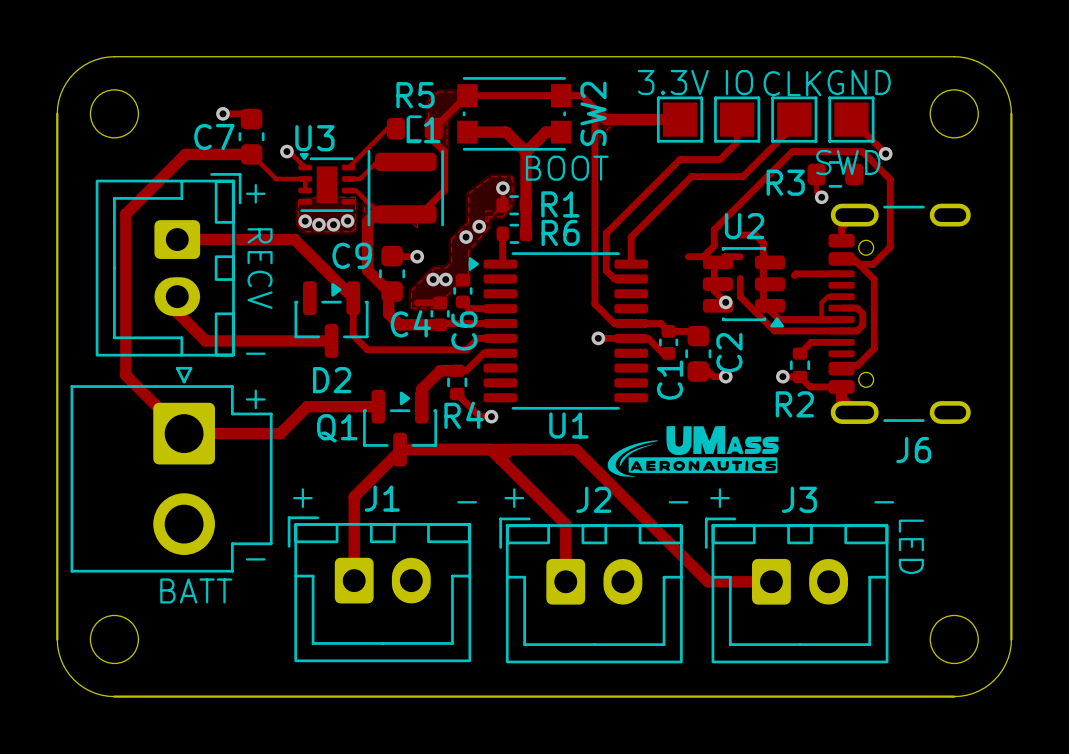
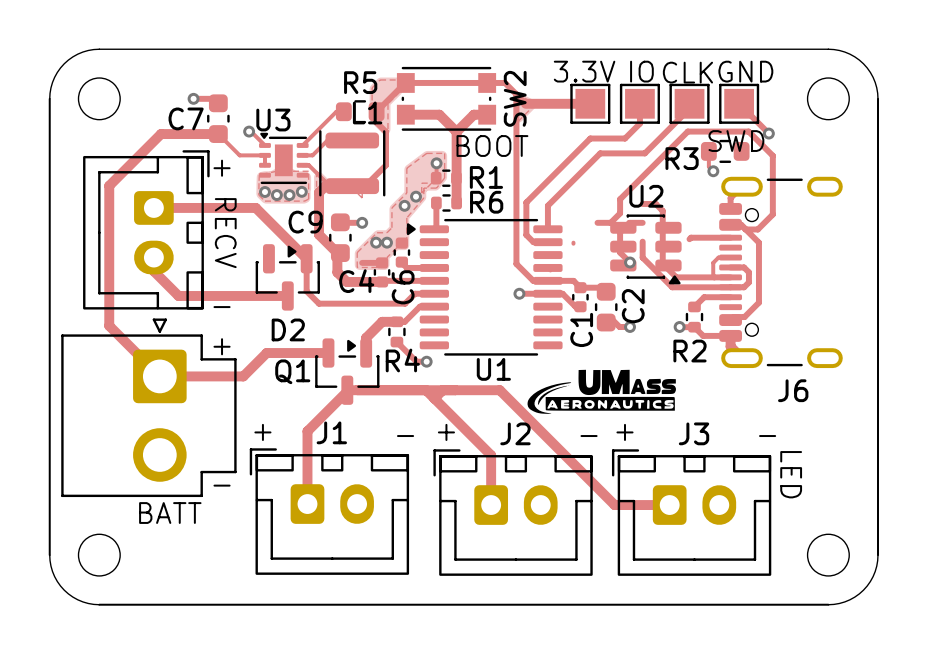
track: none -> (573, 242) (573, 243)

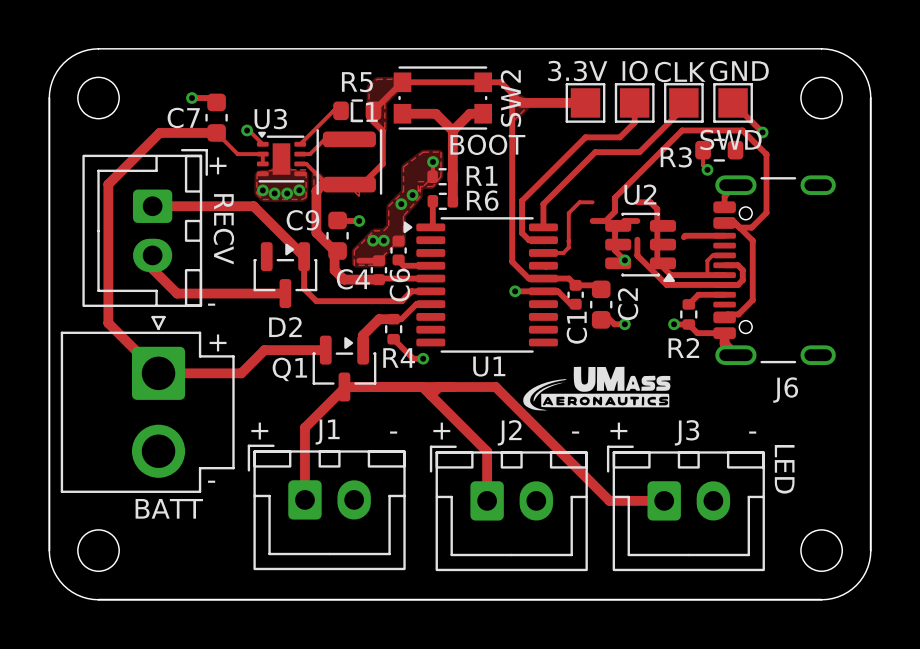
track: none -> (592, 202) (579, 202) (568, 213) (568, 240)
track: none -> (568, 241) (568, 247) (563, 252) (543, 252)

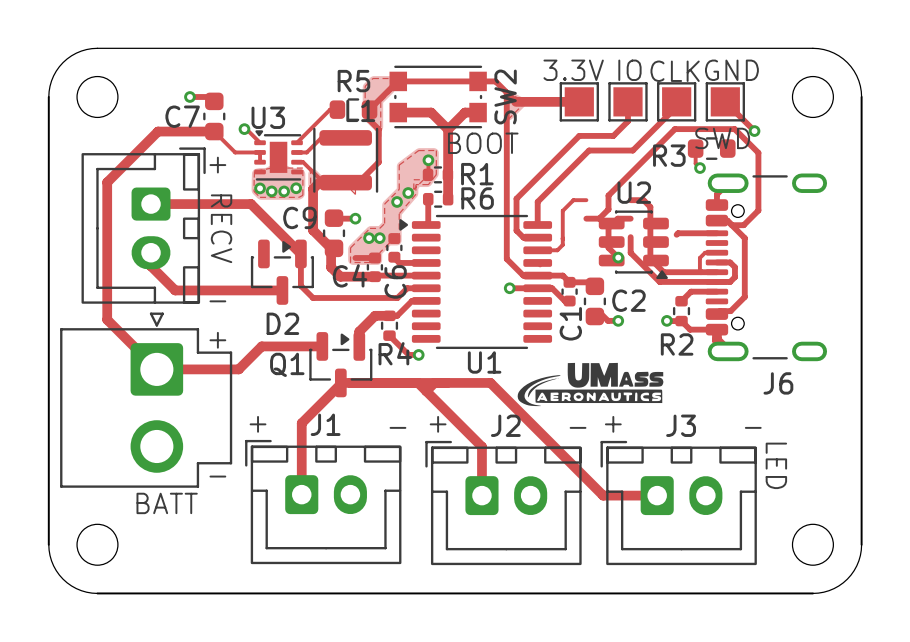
C2 name rotation: 0° (628, 304) -> 90° clockwise (628, 300)

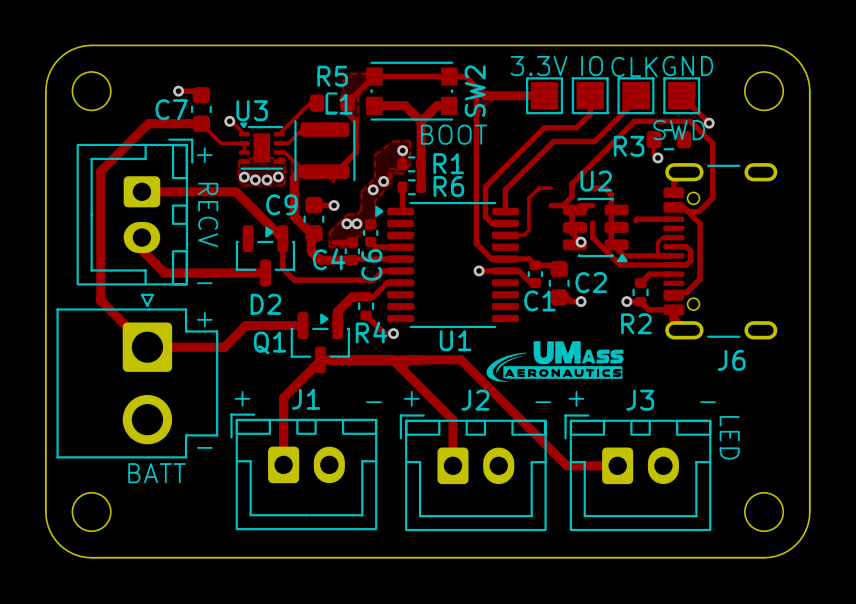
C1 name rotation: 0° (570, 323) -> 90° clockwise (539, 300)

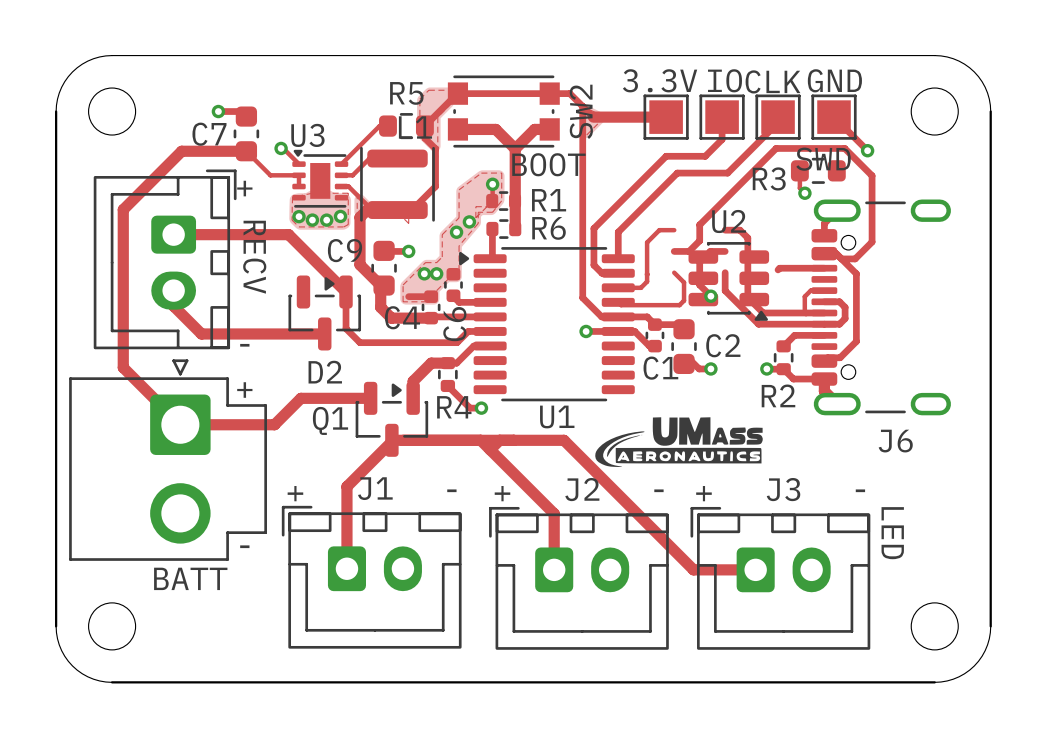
track: none -> (674, 272) (684, 282) (684, 300) (679, 305) (621, 305)

